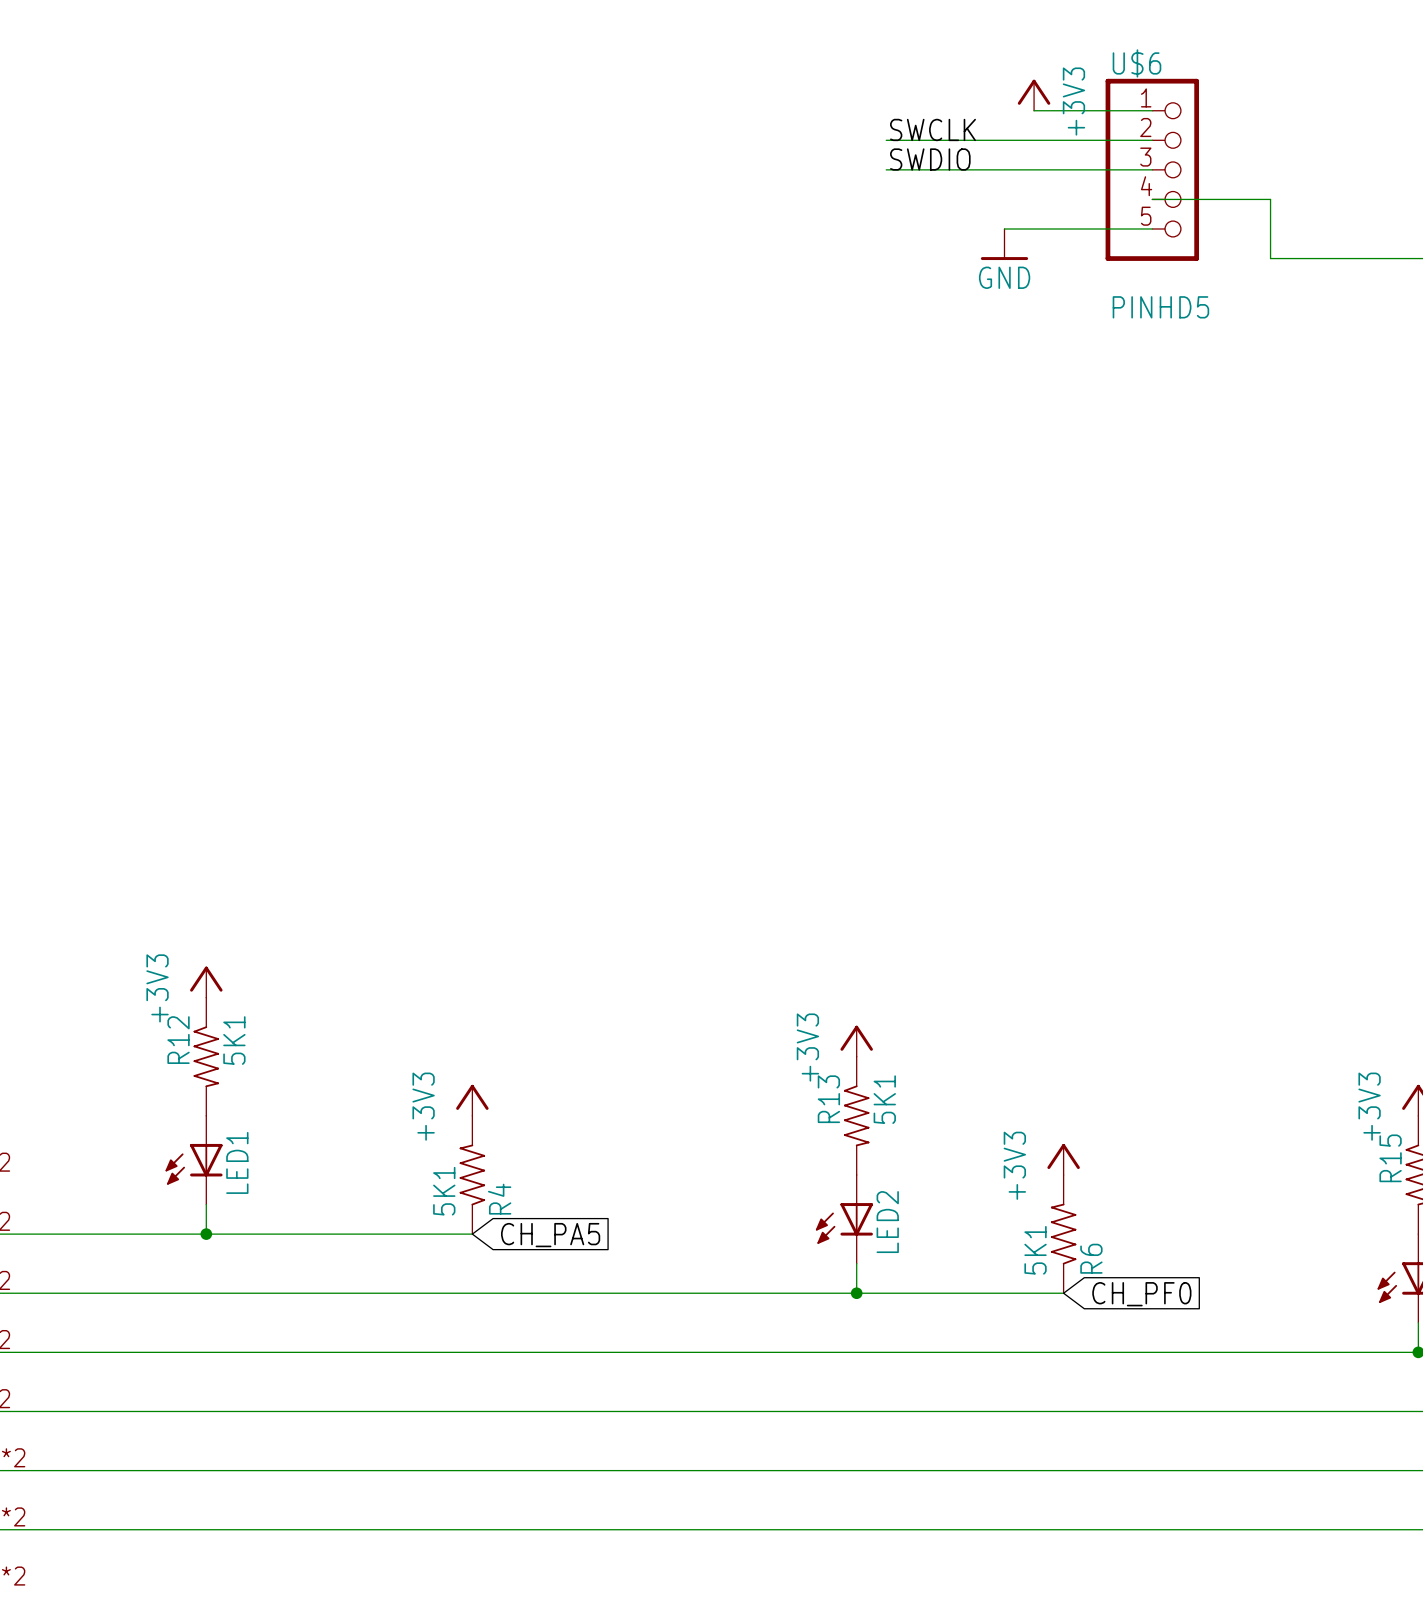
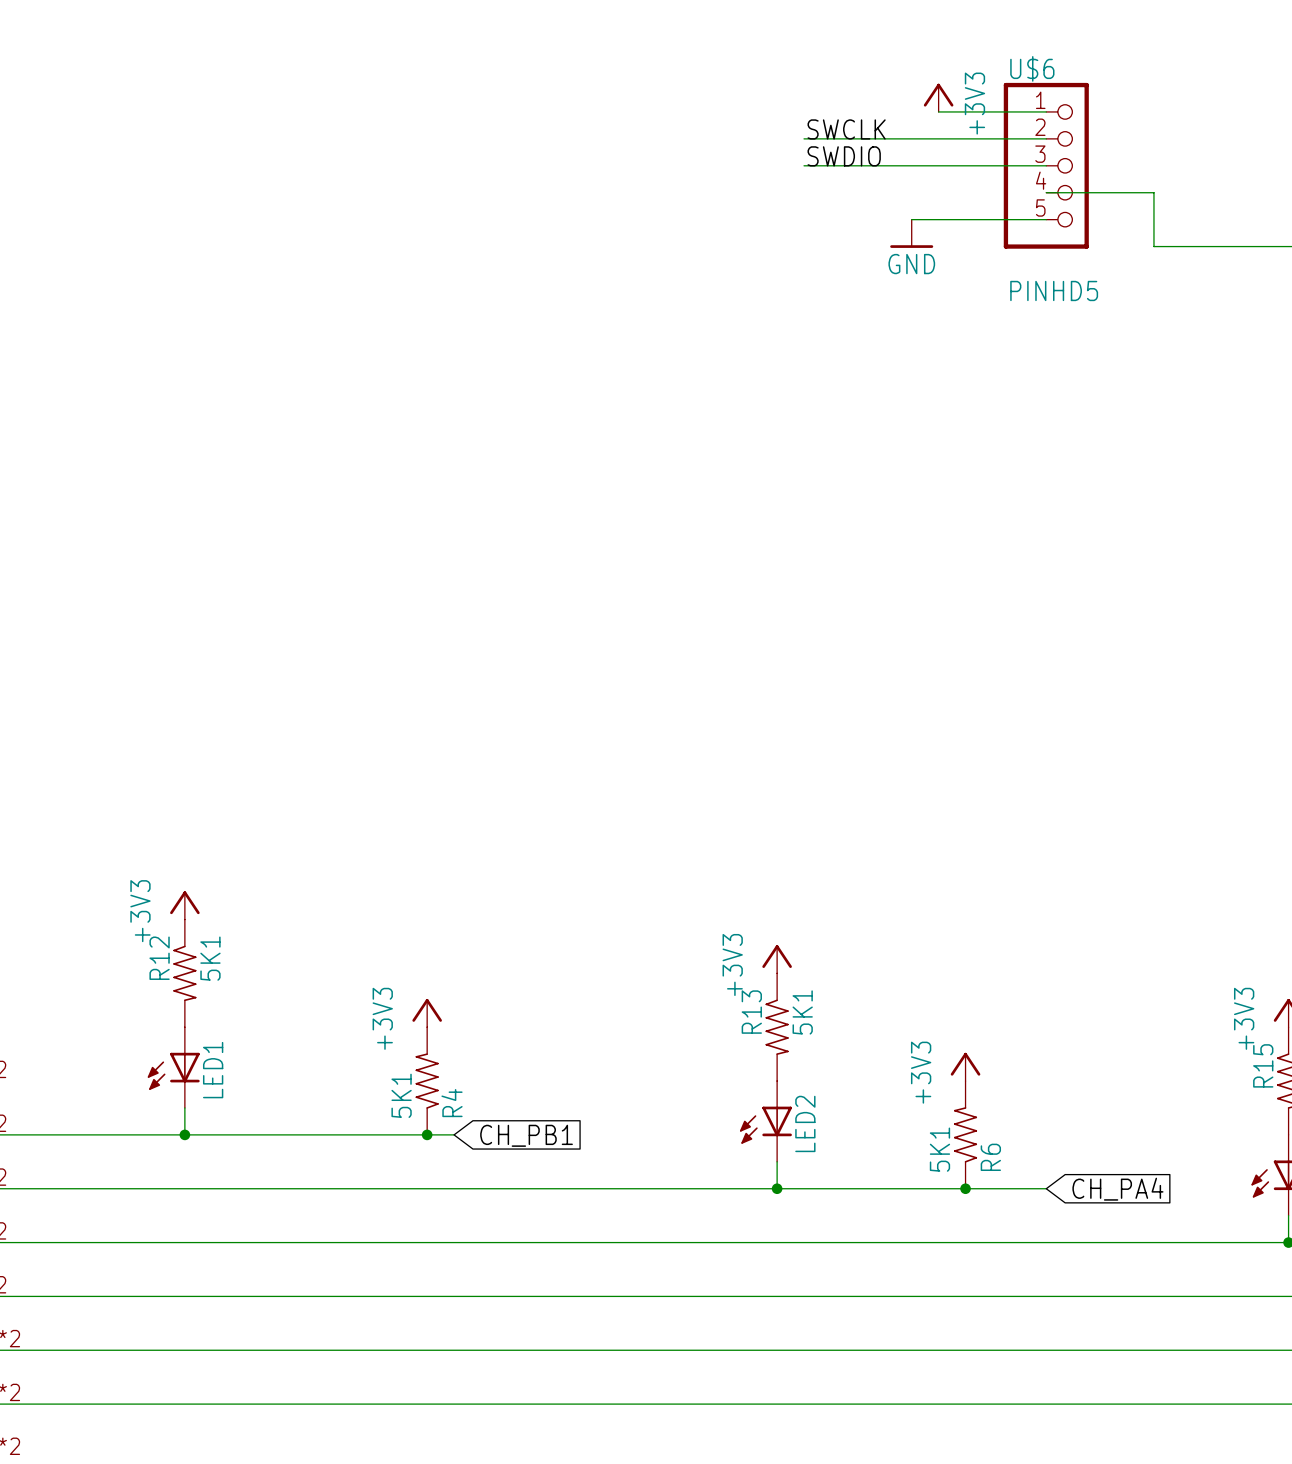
wire: none -> (427, 1134) (454, 1134)
junction: none -> (427, 1134)
global label: CH_PA5 (550, 1235) -> CH_PB1 (526, 1135)
wire: none -> (965, 1188) (1046, 1188)
junction: none -> (965, 1188)
global label: CH_PF0 (1141, 1294) -> CH_PA4 (1117, 1189)

